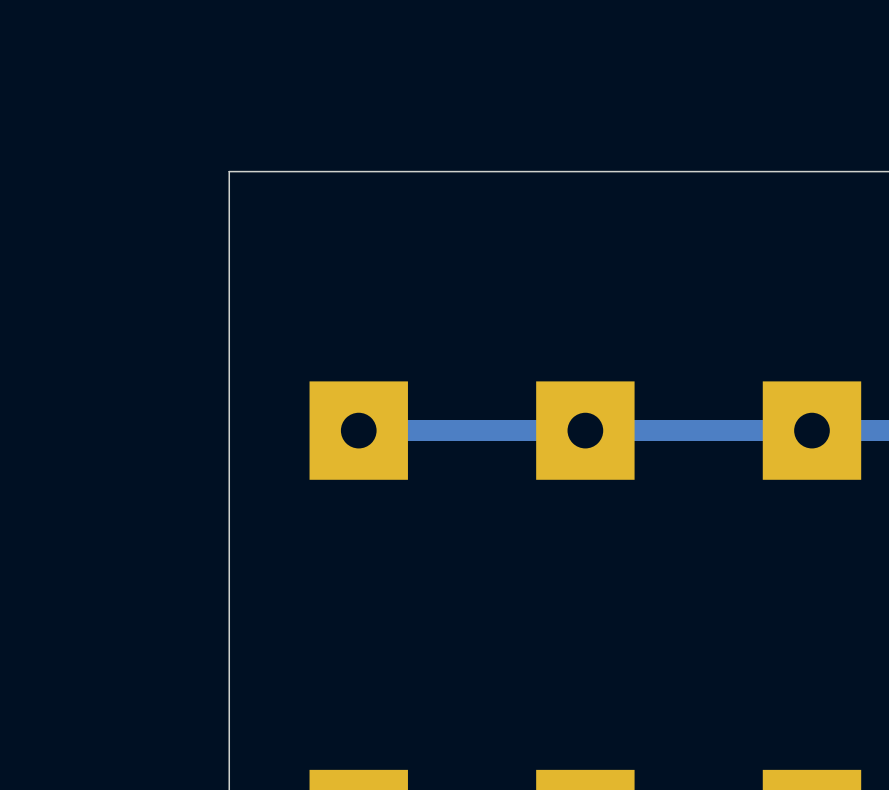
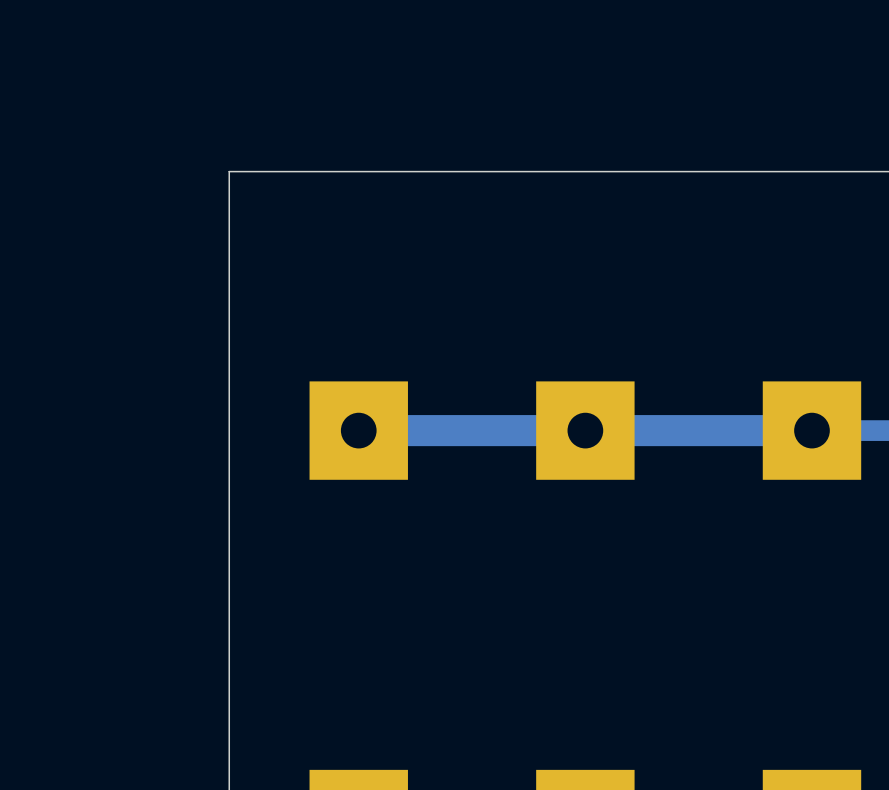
track width: thin (811, 430) (358, 430) -> thick (811, 430) (358, 430)

